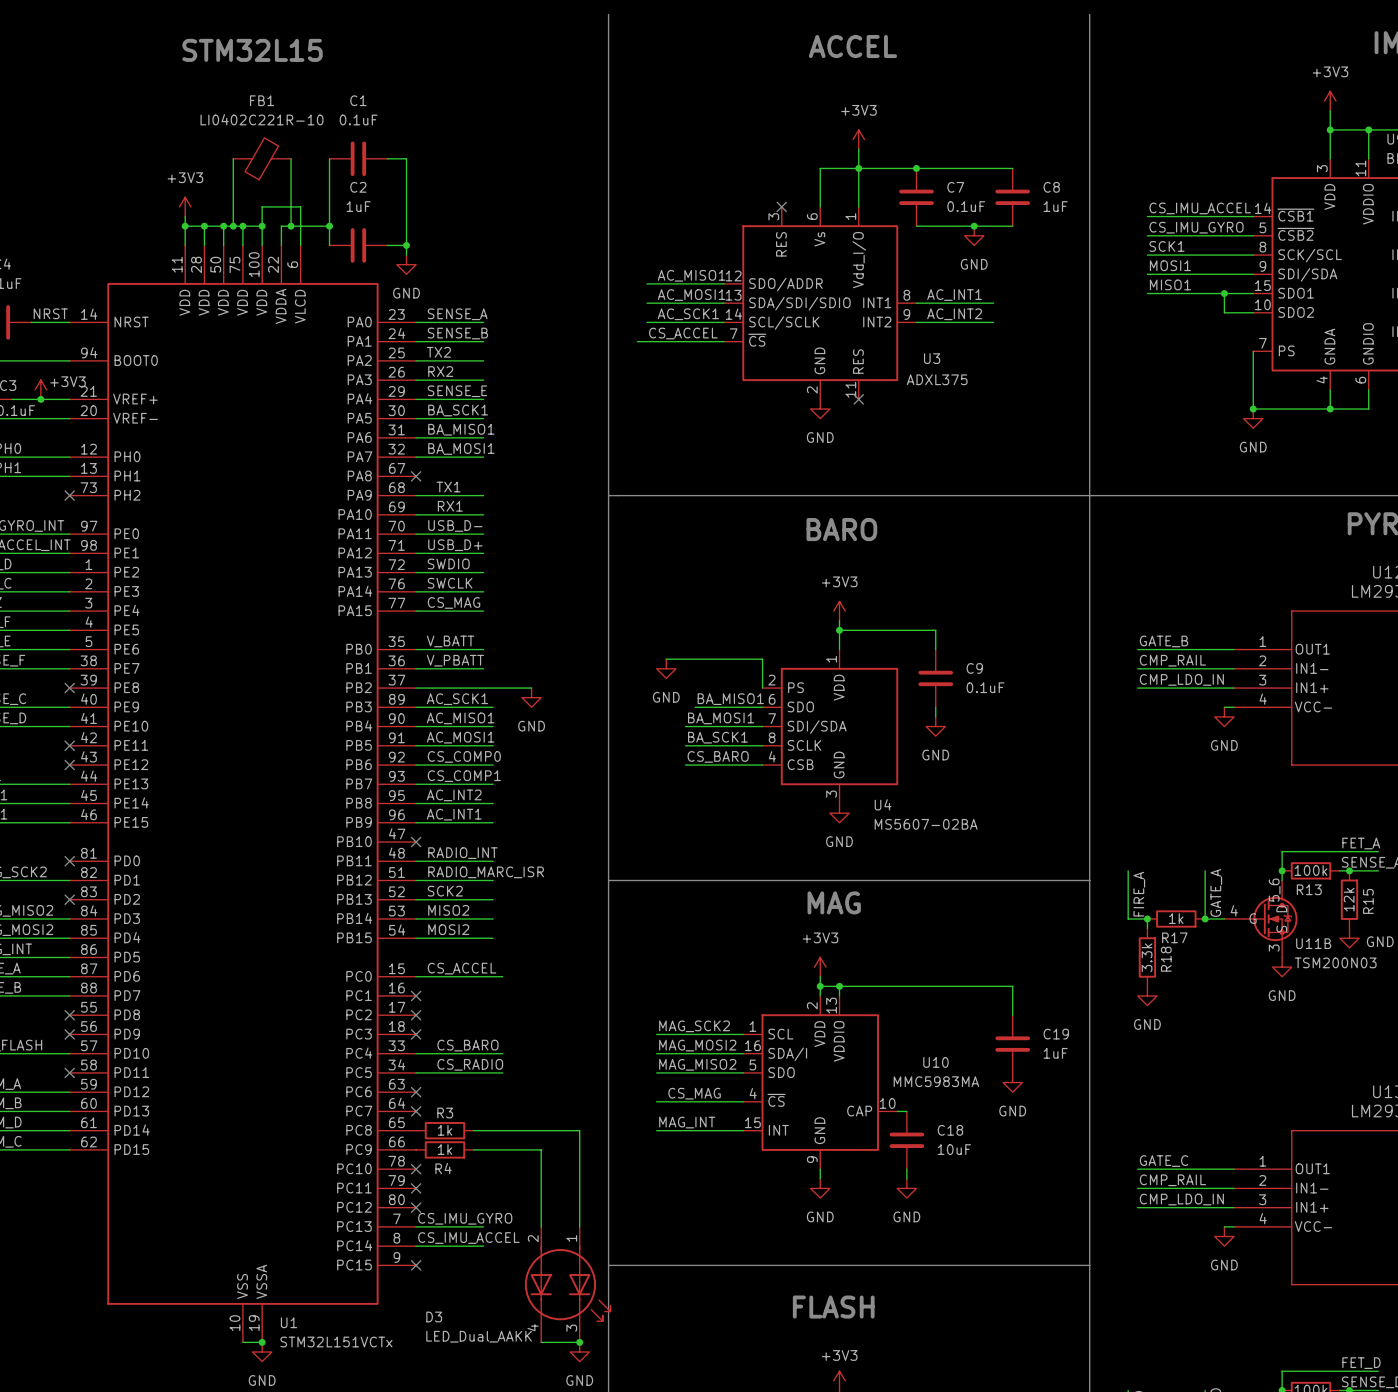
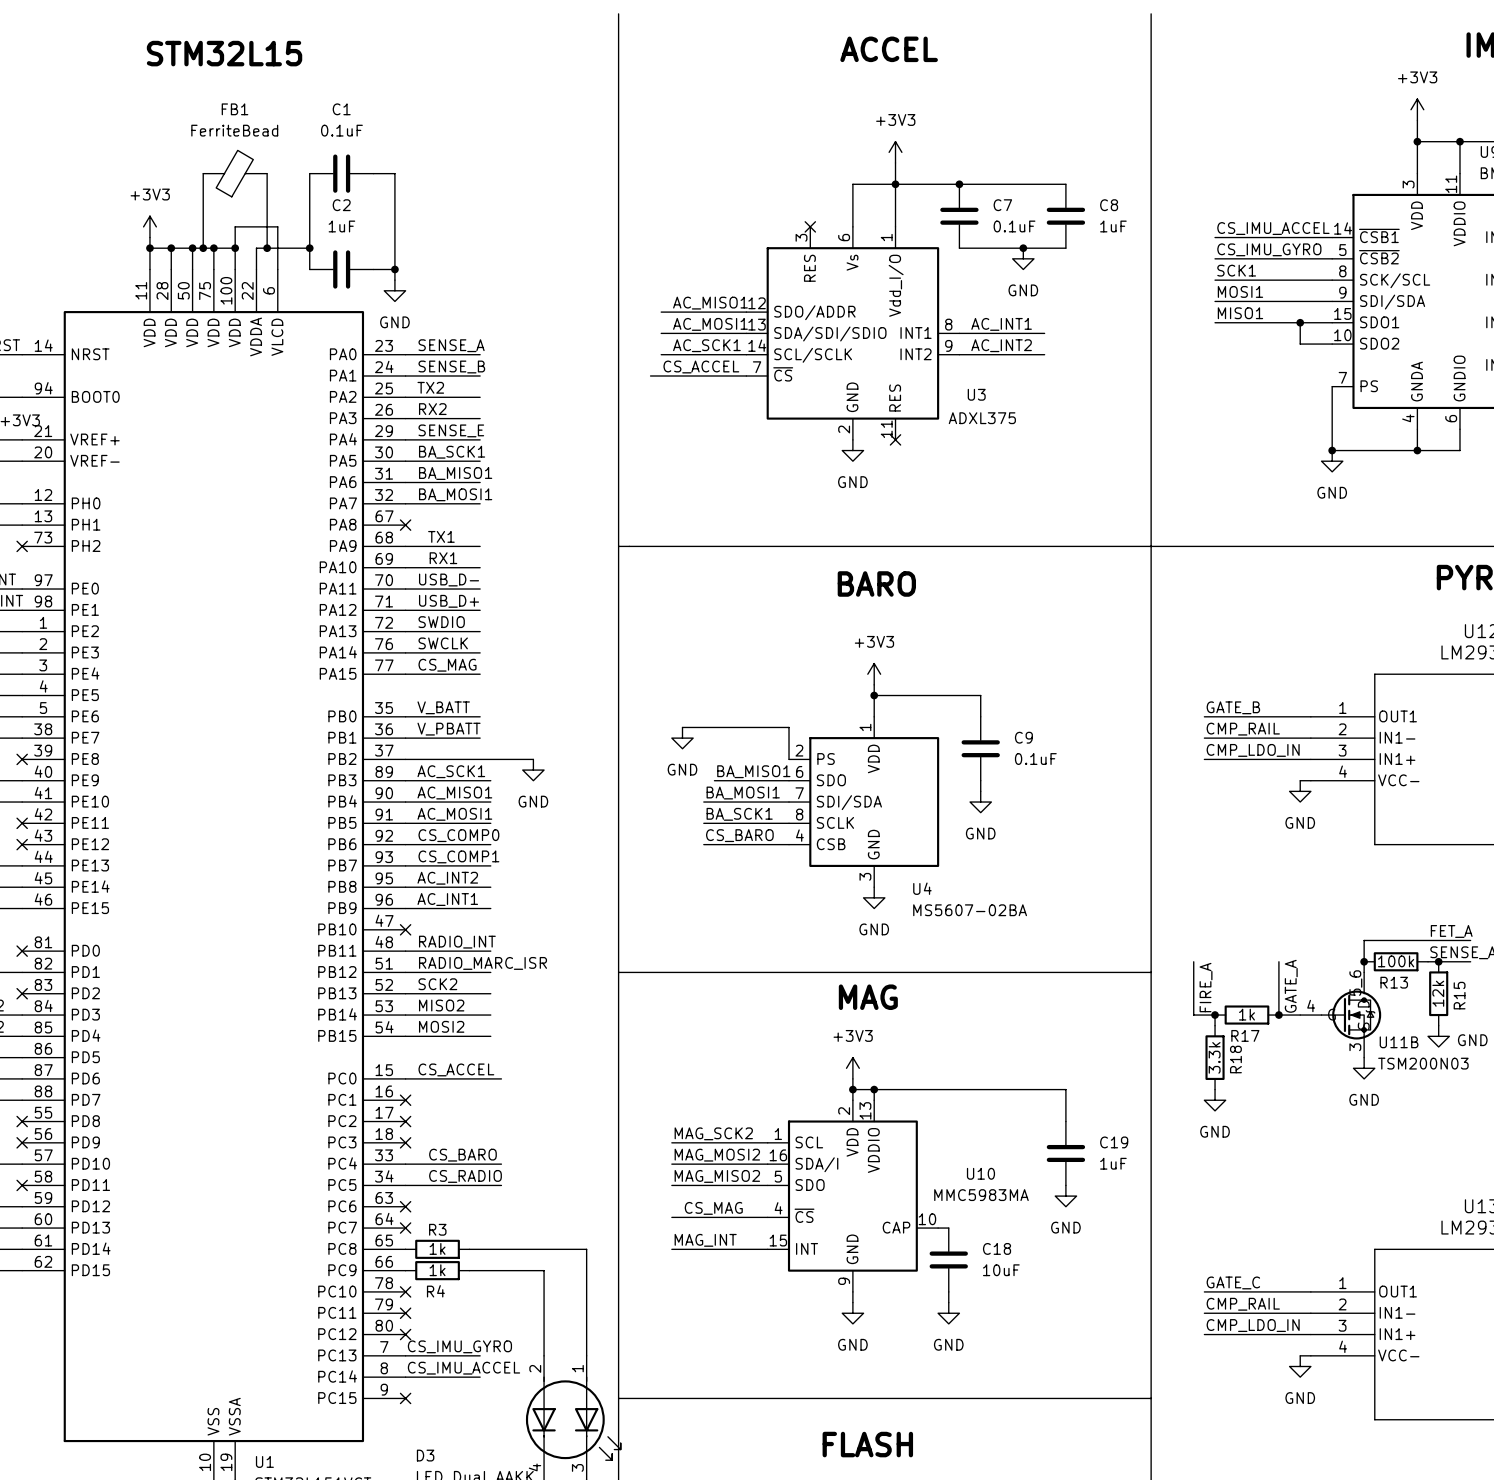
FB1 value: LI0402C221R-10 (262, 119) -> FerriteBead (234, 130)

